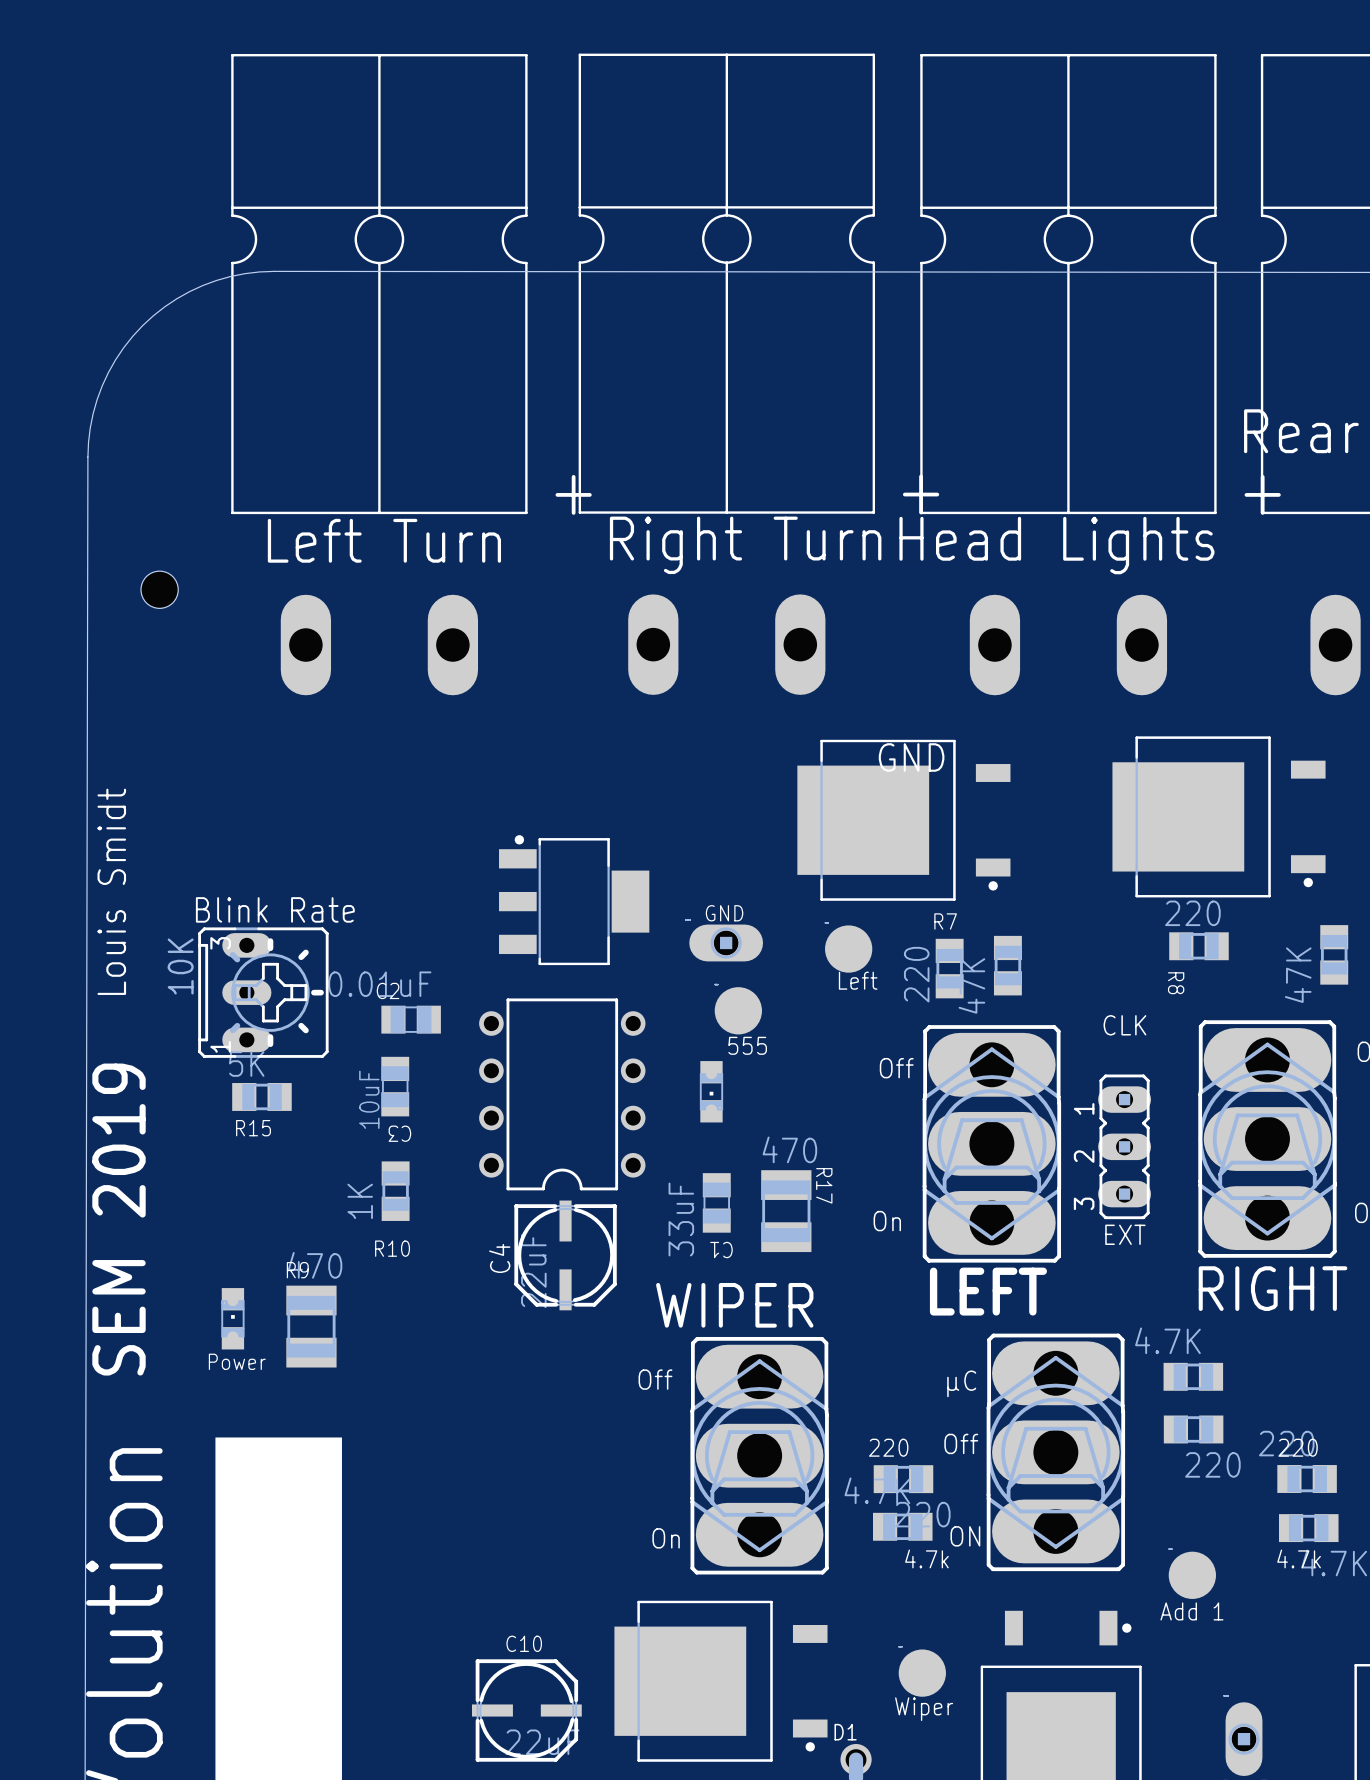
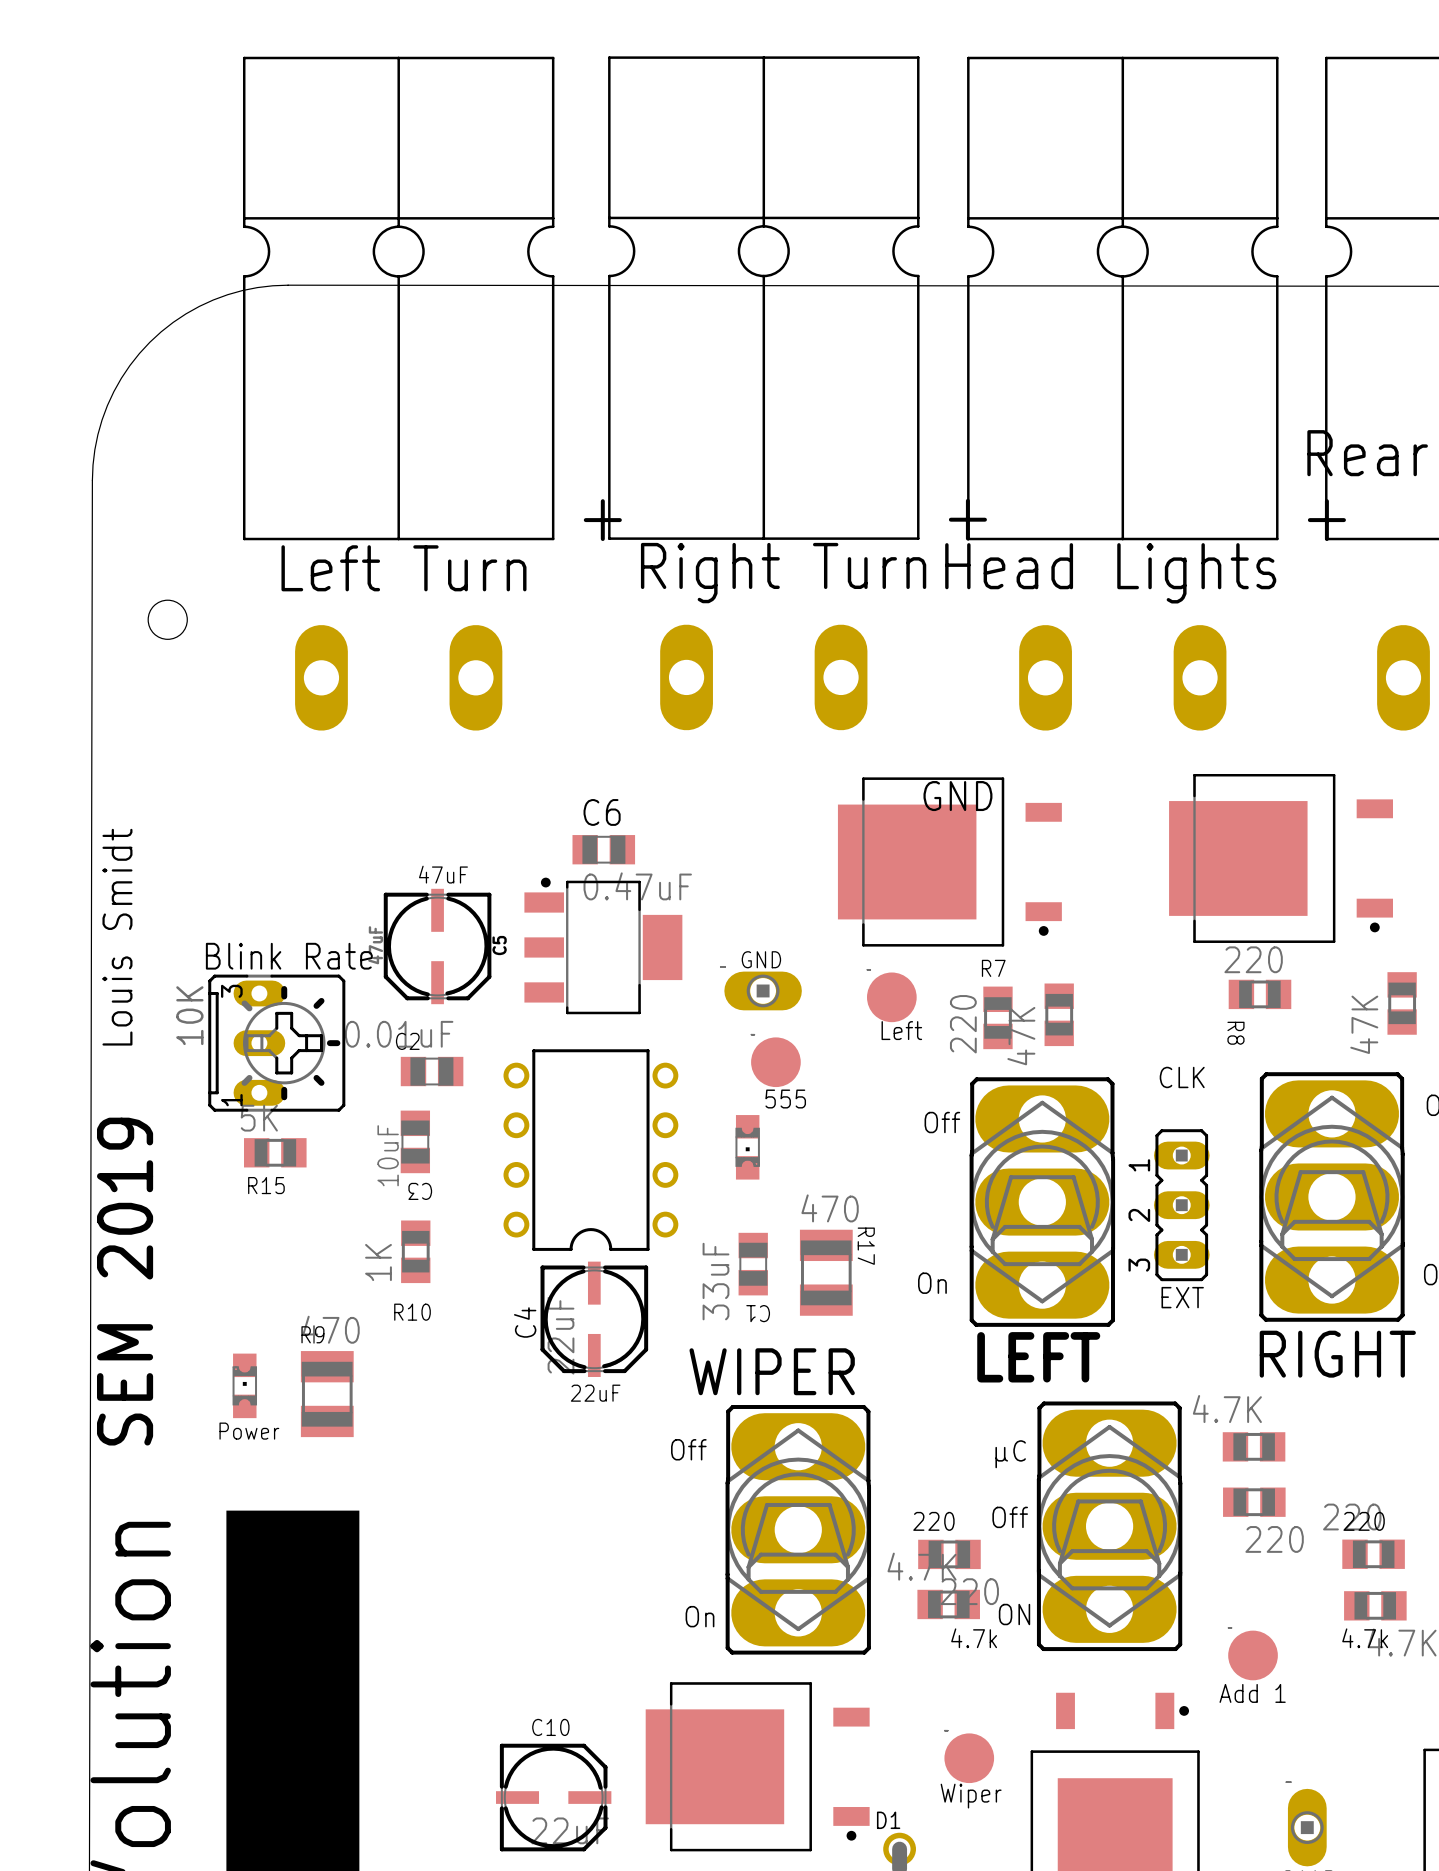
C6: none -> 0.47uF (603, 849)
text: none -> 47uF (443, 874)
C5: none -> 47uF (437, 946)
text: none -> 22uF (595, 1393)

